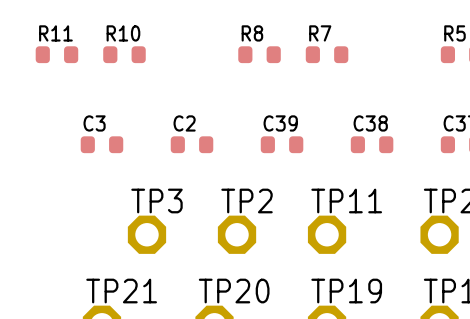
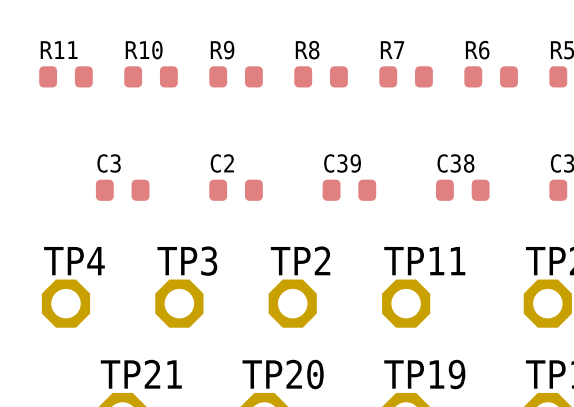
R9: none -> (236, 76)
R6: none -> (491, 76)
TP4: none -> (65, 303)

